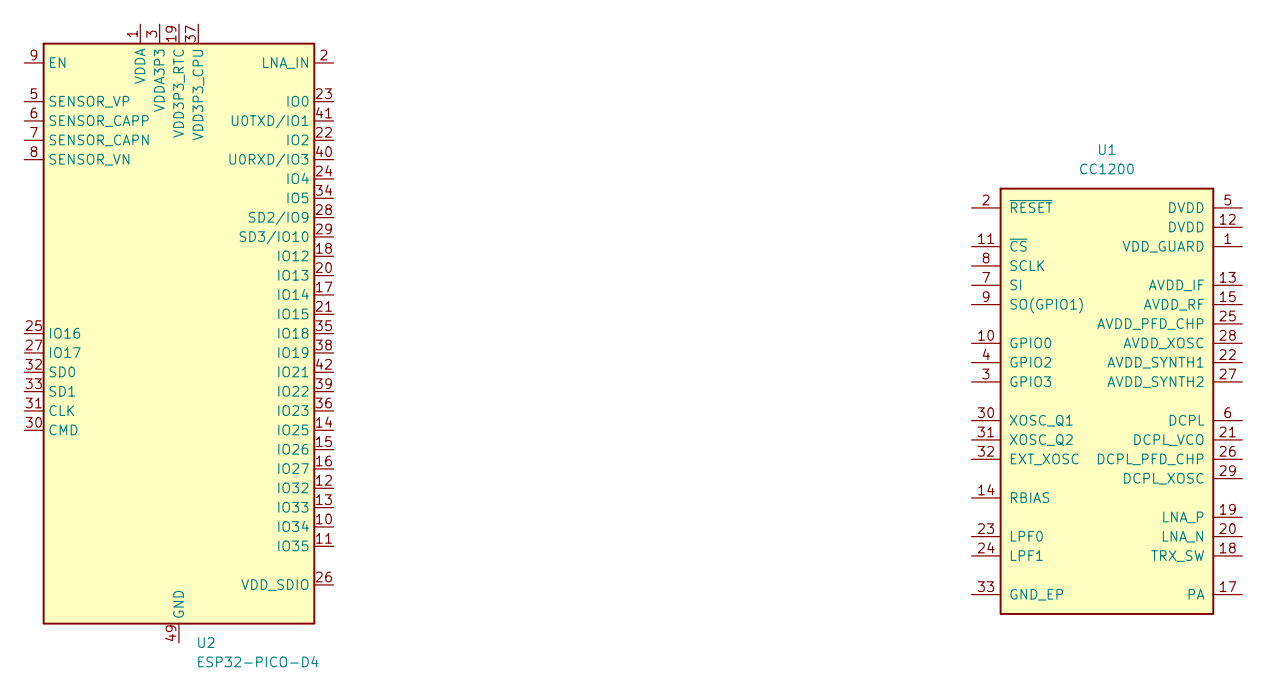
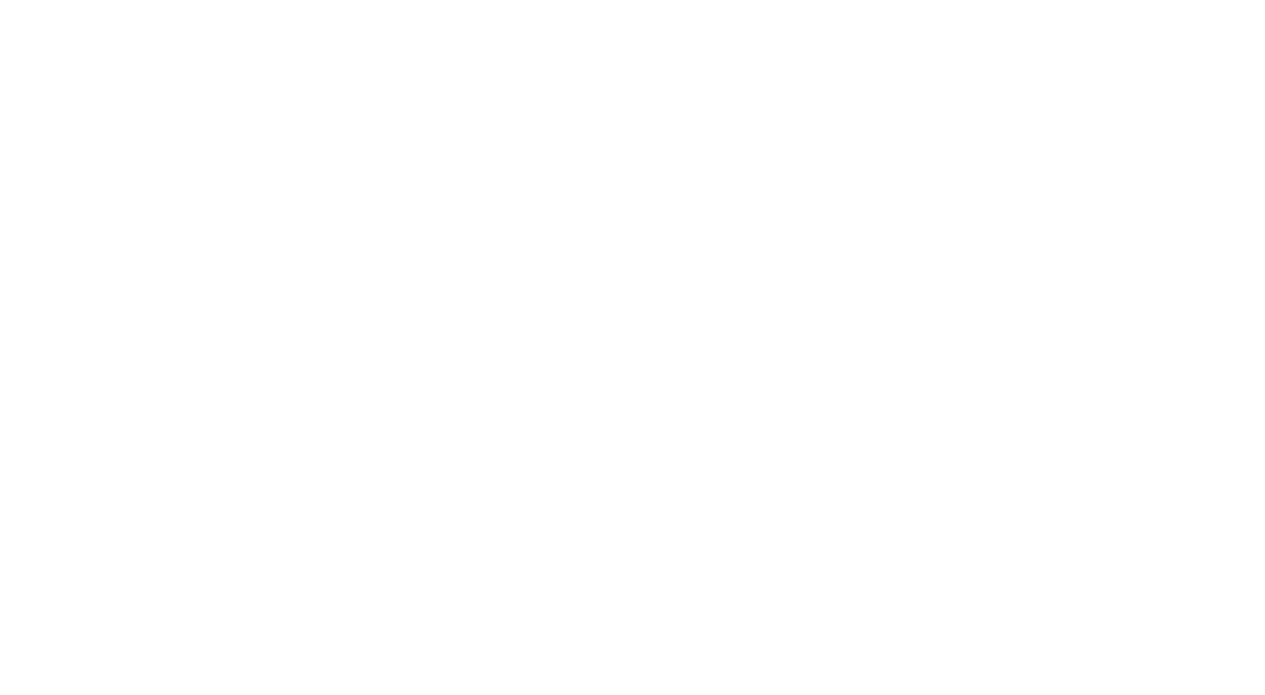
U2: ESP32-PICO-D4 (178, 333) -> none
U1: CC1200 (1106, 401) -> none

